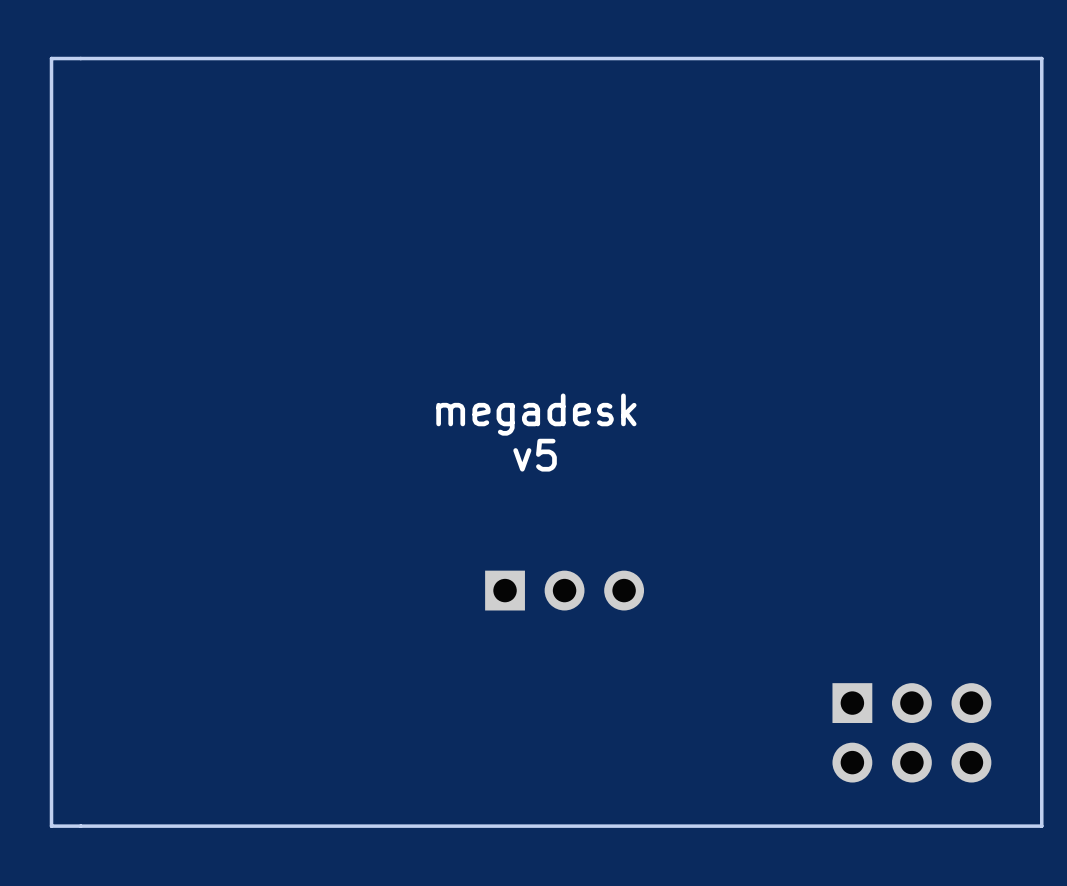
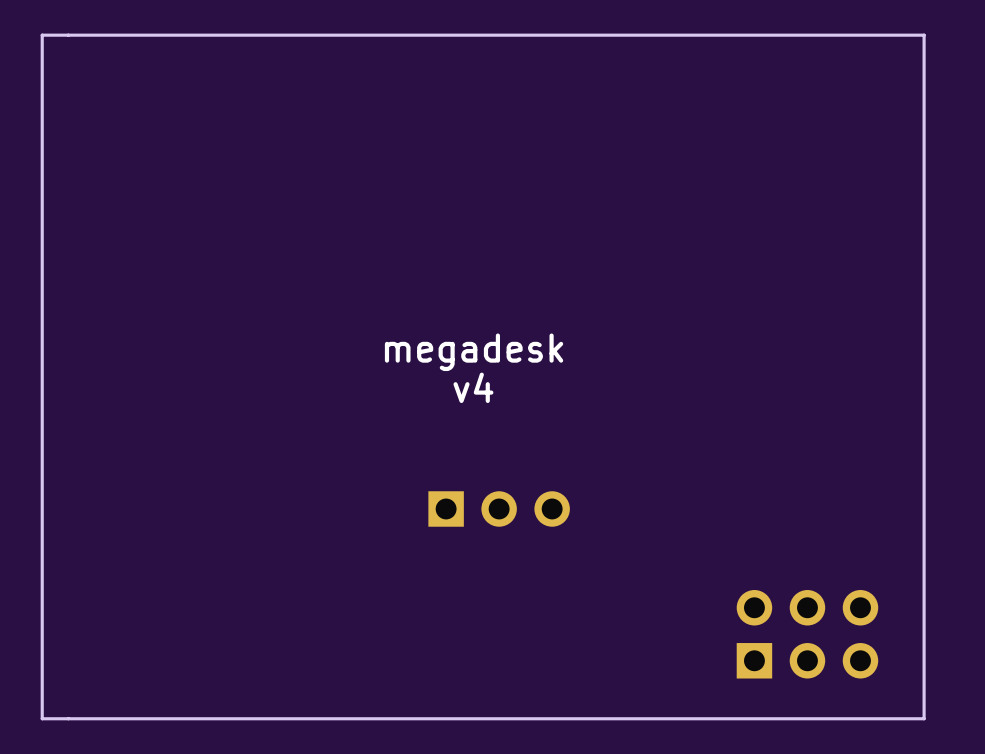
text: v5 (535, 455) -> v4 (473, 387)
part footprint: [832, 683, 992, 783] -> [736, 590, 879, 679]

